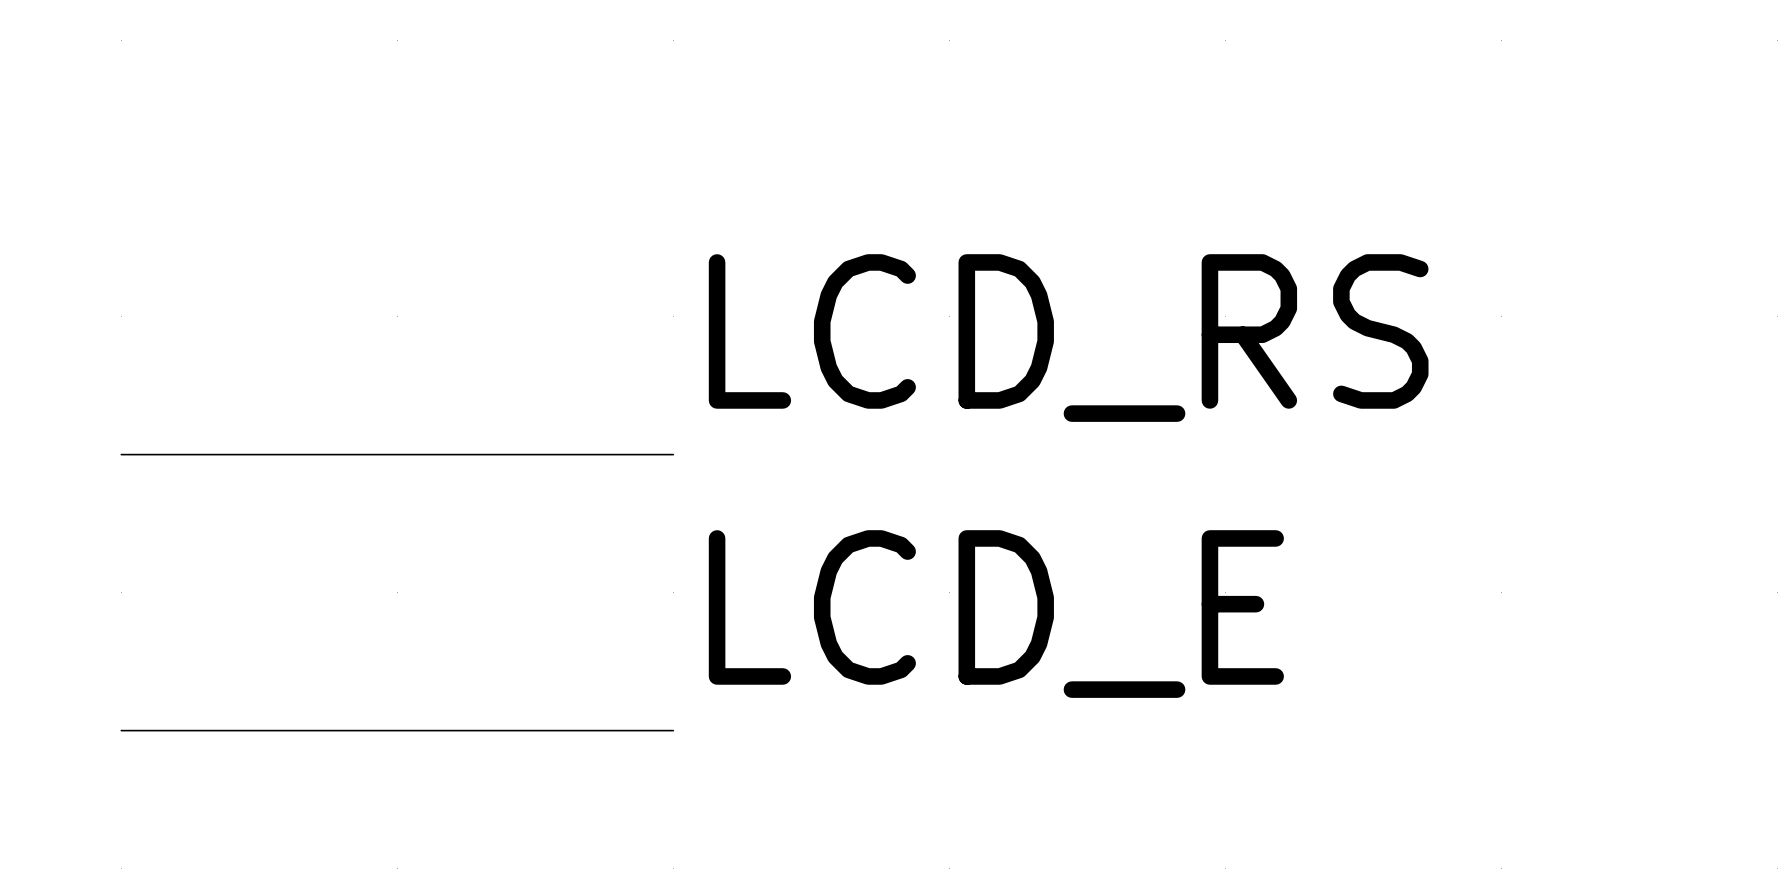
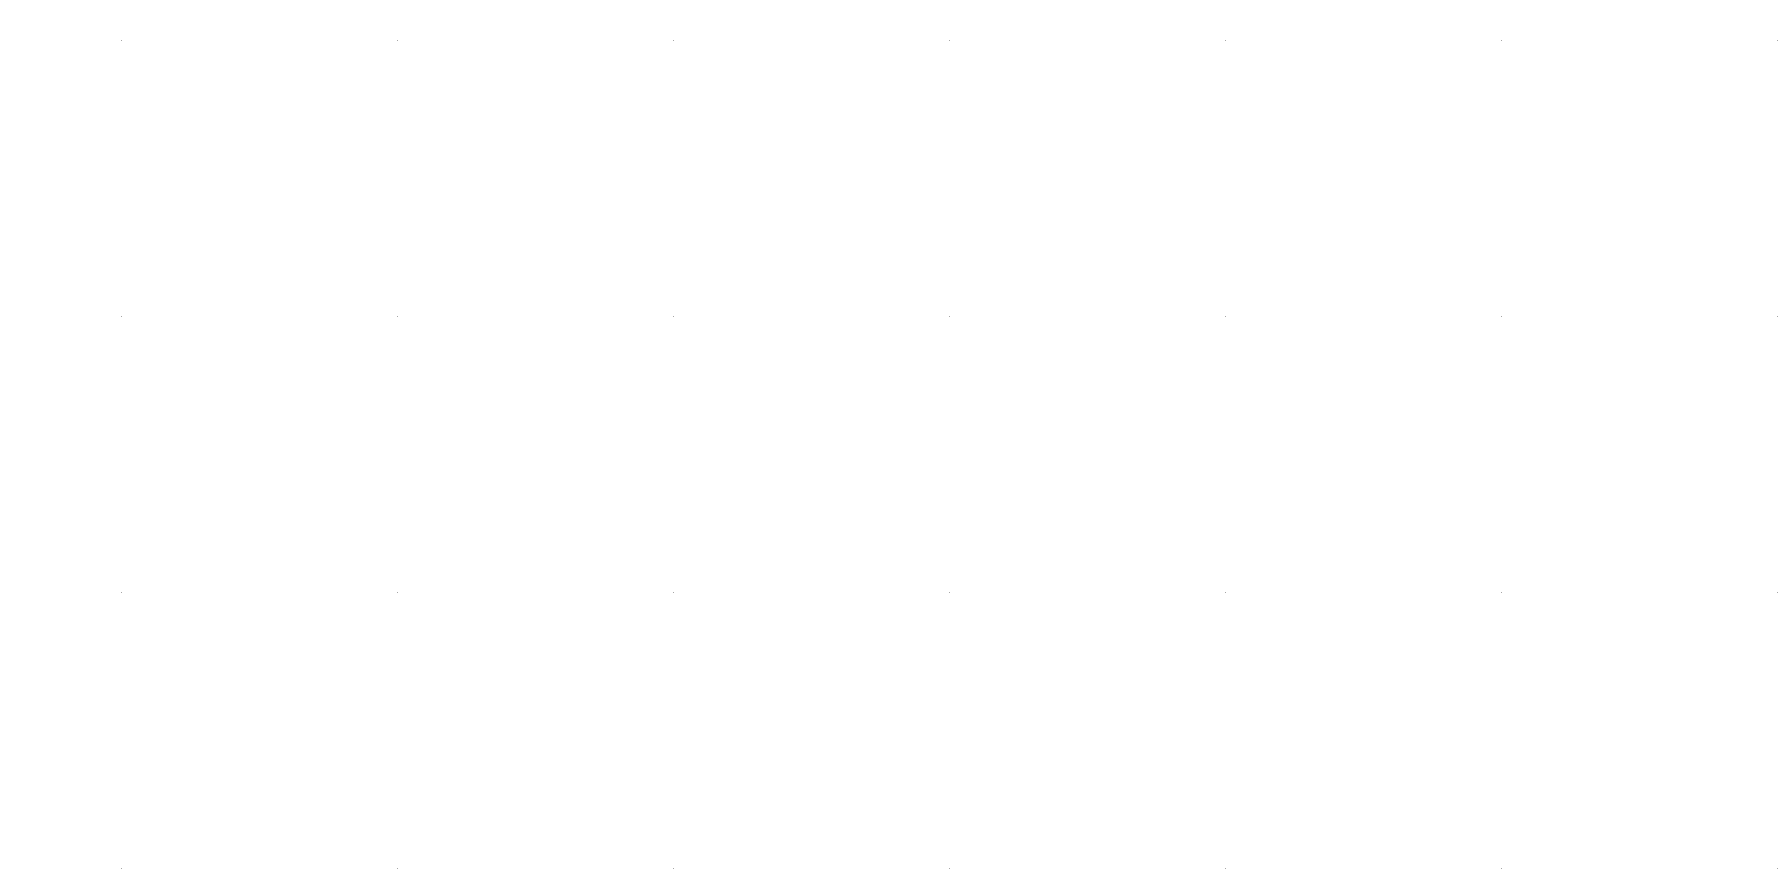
label: LCD_RS (1068, 338) -> none
wire: (121, 454) (673, 454) -> none
label: LCD_E (996, 614) -> none
wire: (121, 730) (673, 730) -> none

